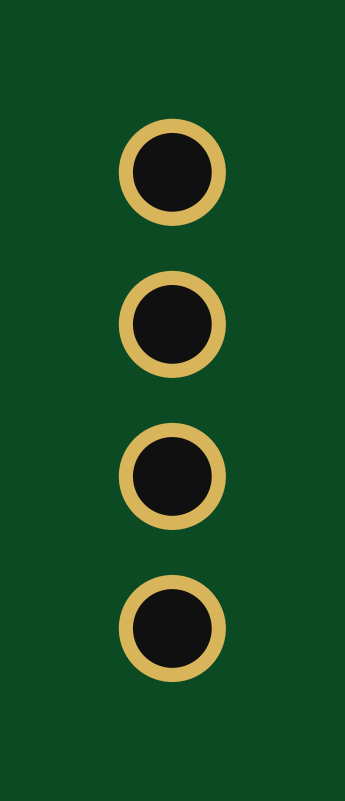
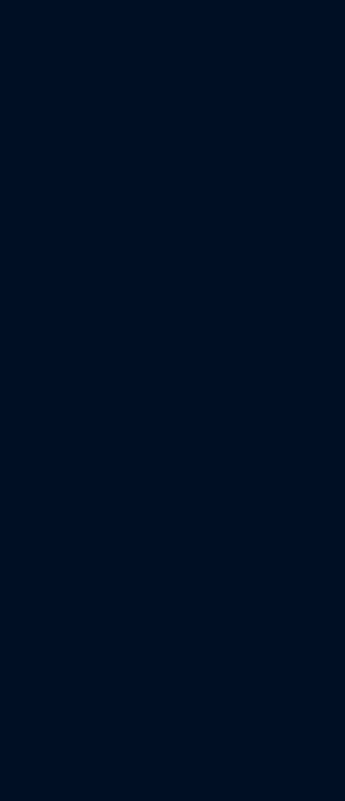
part: (172, 172) -> none
part: (172, 324) -> none
part: (172, 476) -> none
part: (172, 628) -> none

